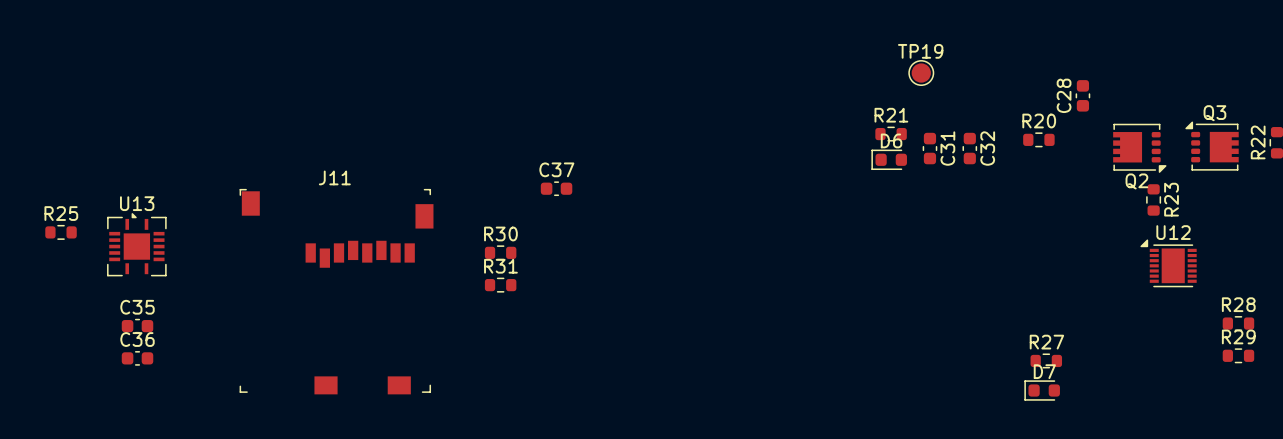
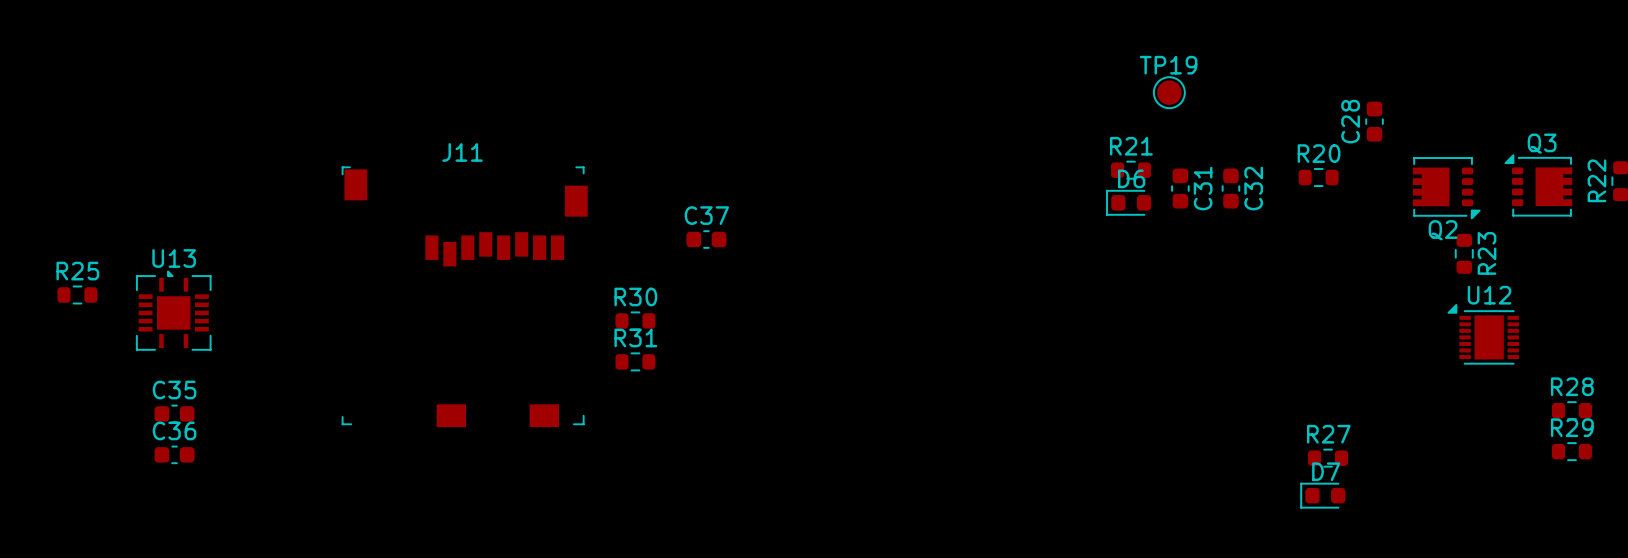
J11 position: (336, 291) -> (464, 296)

